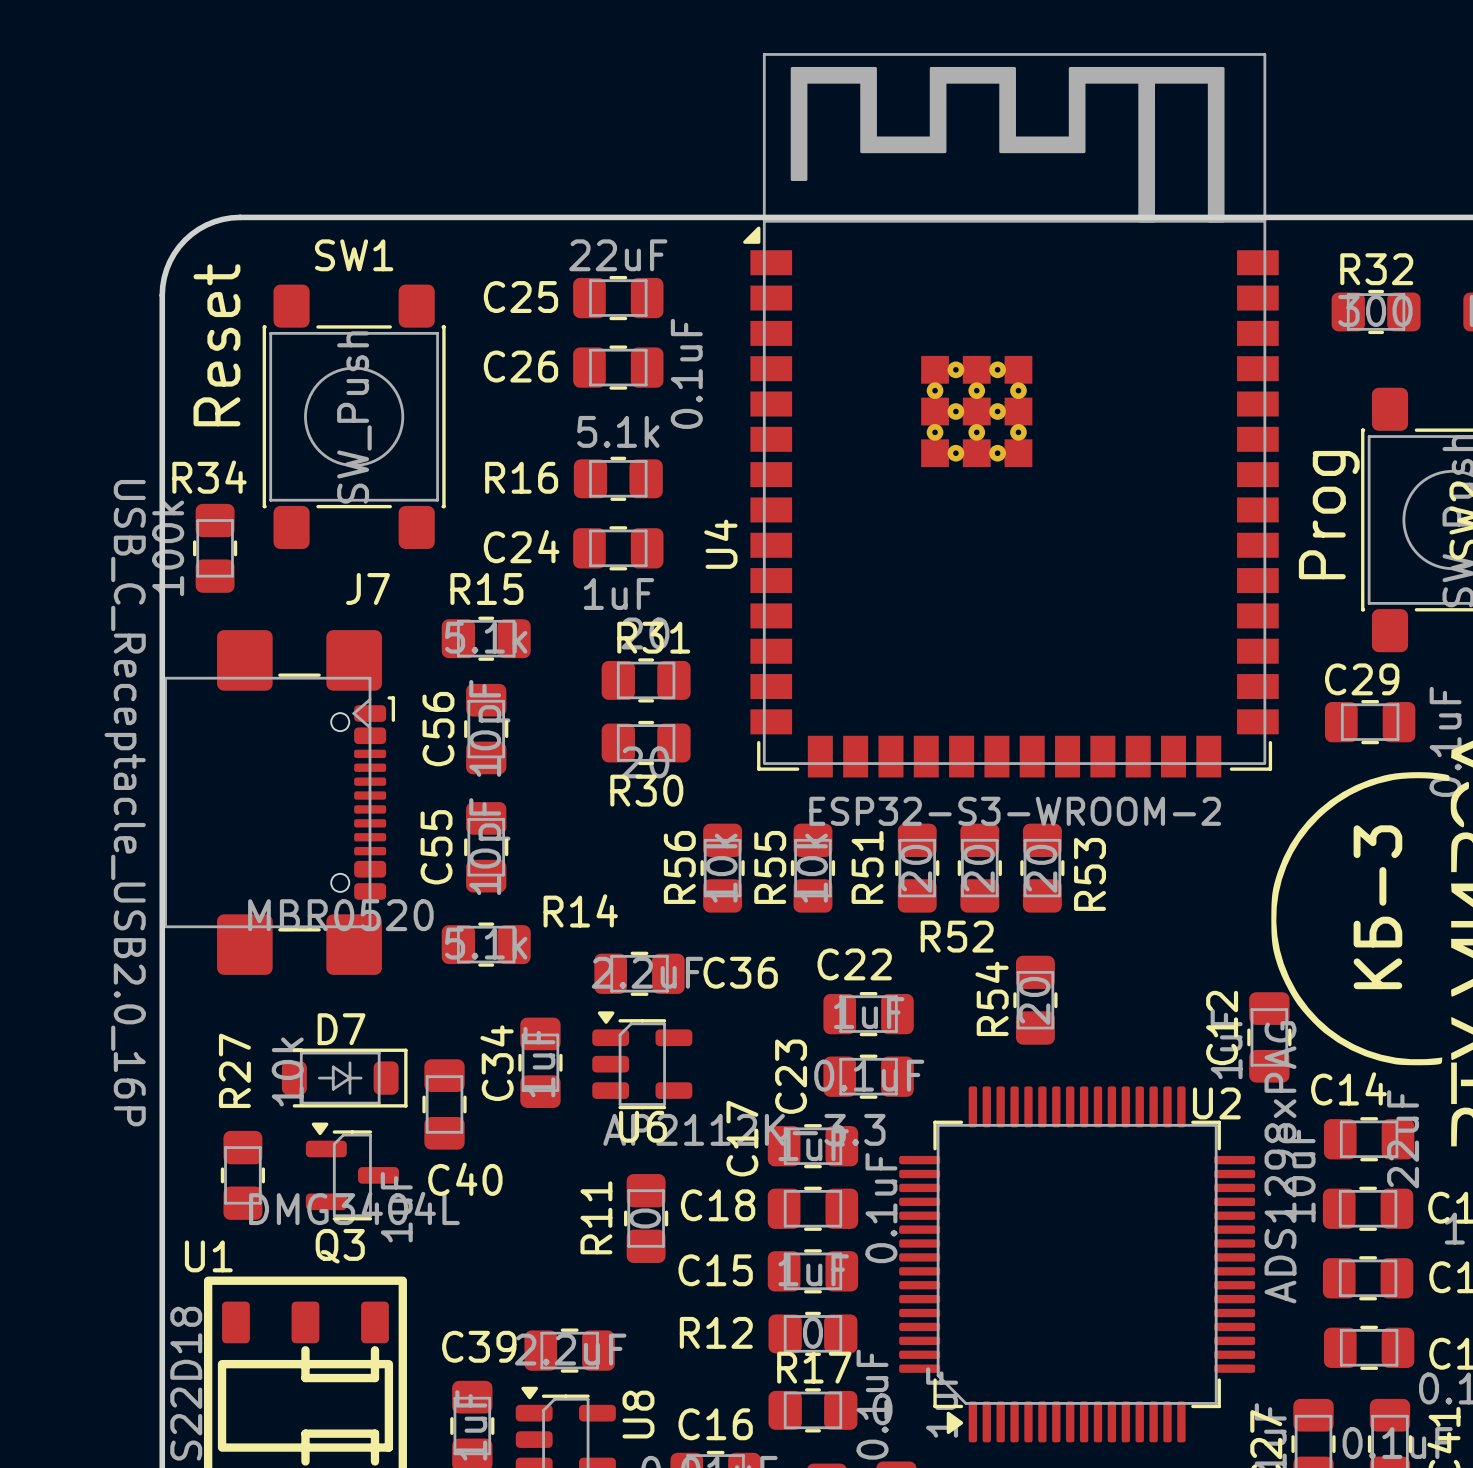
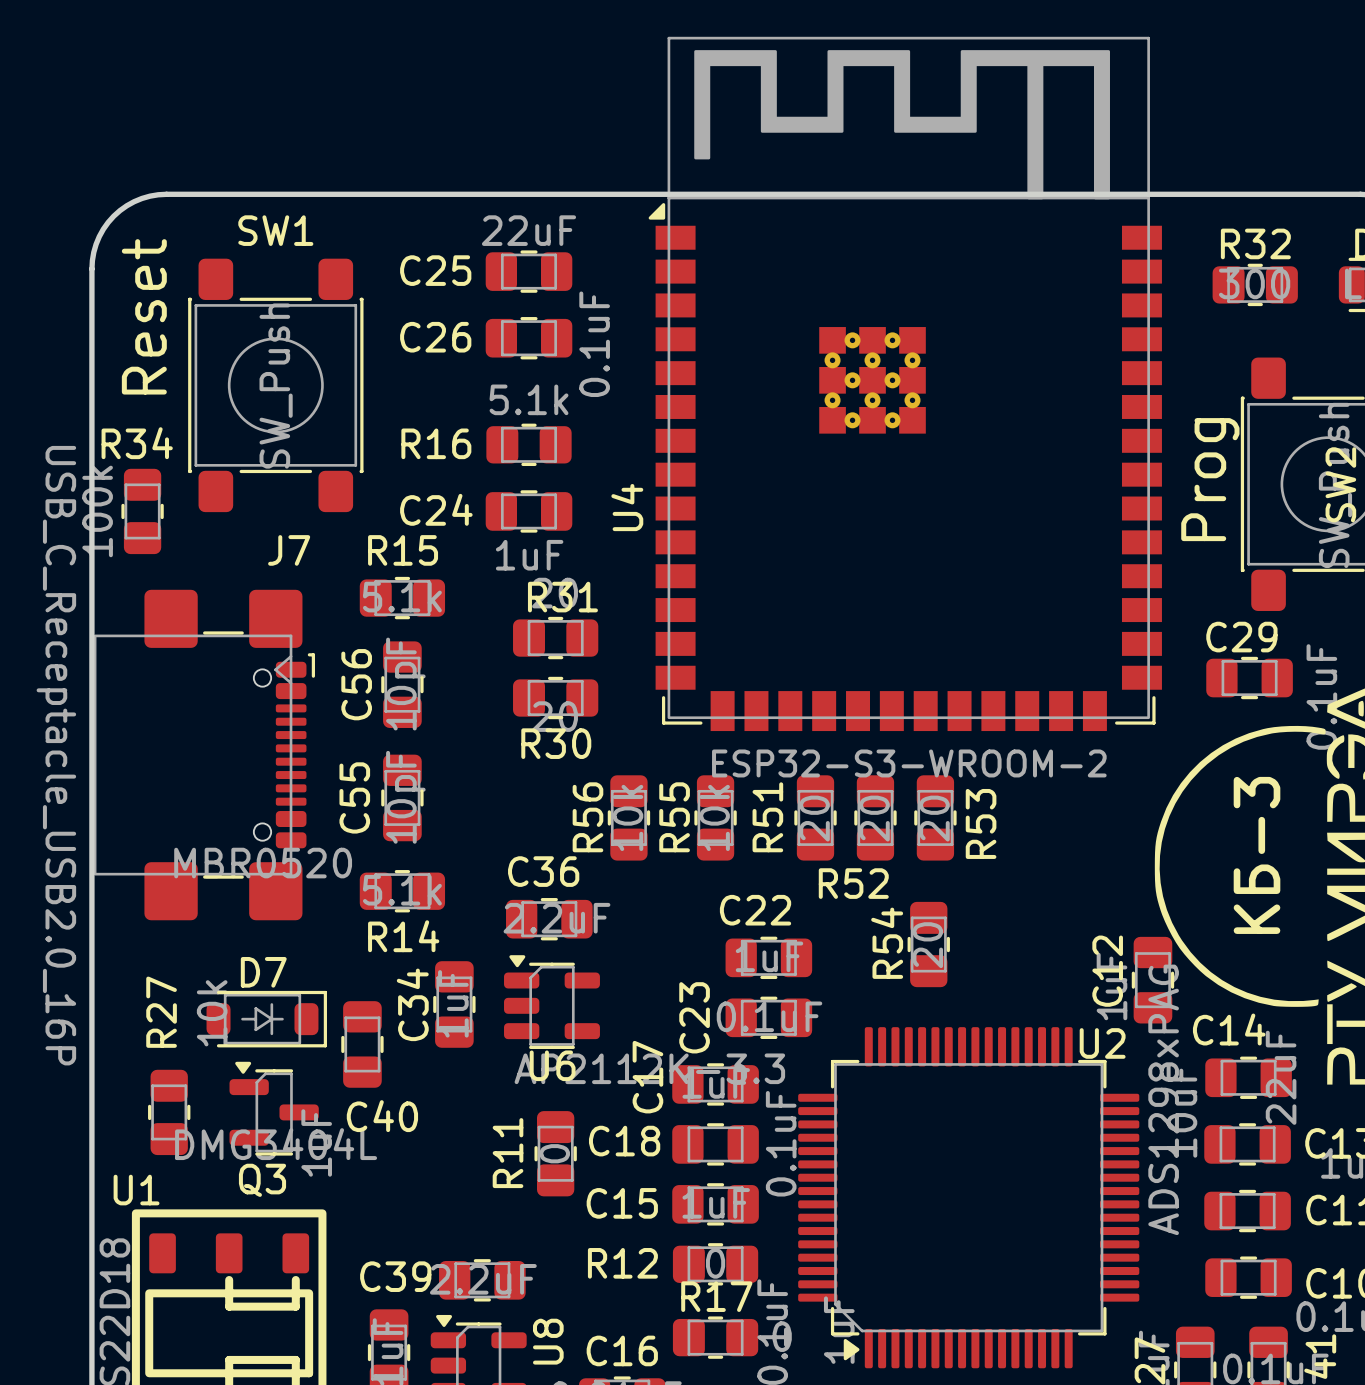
R14 name position: R14 (580, 910) -> R14 (403, 936)
C36 name position: C36 (740, 972) -> C36 (543, 871)

